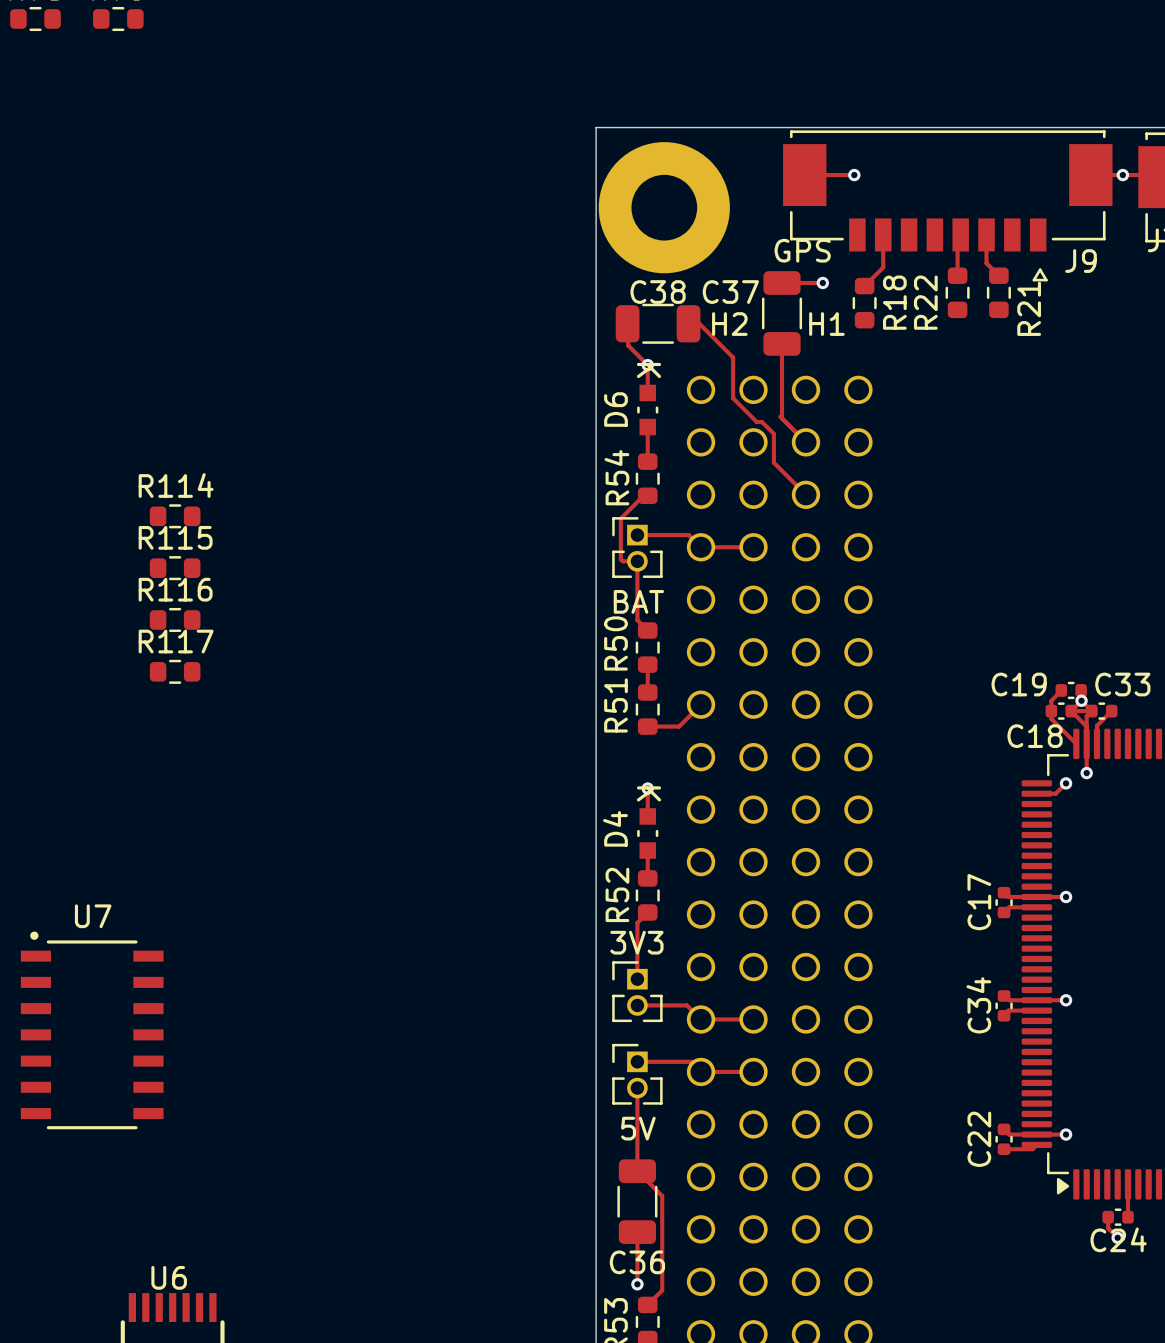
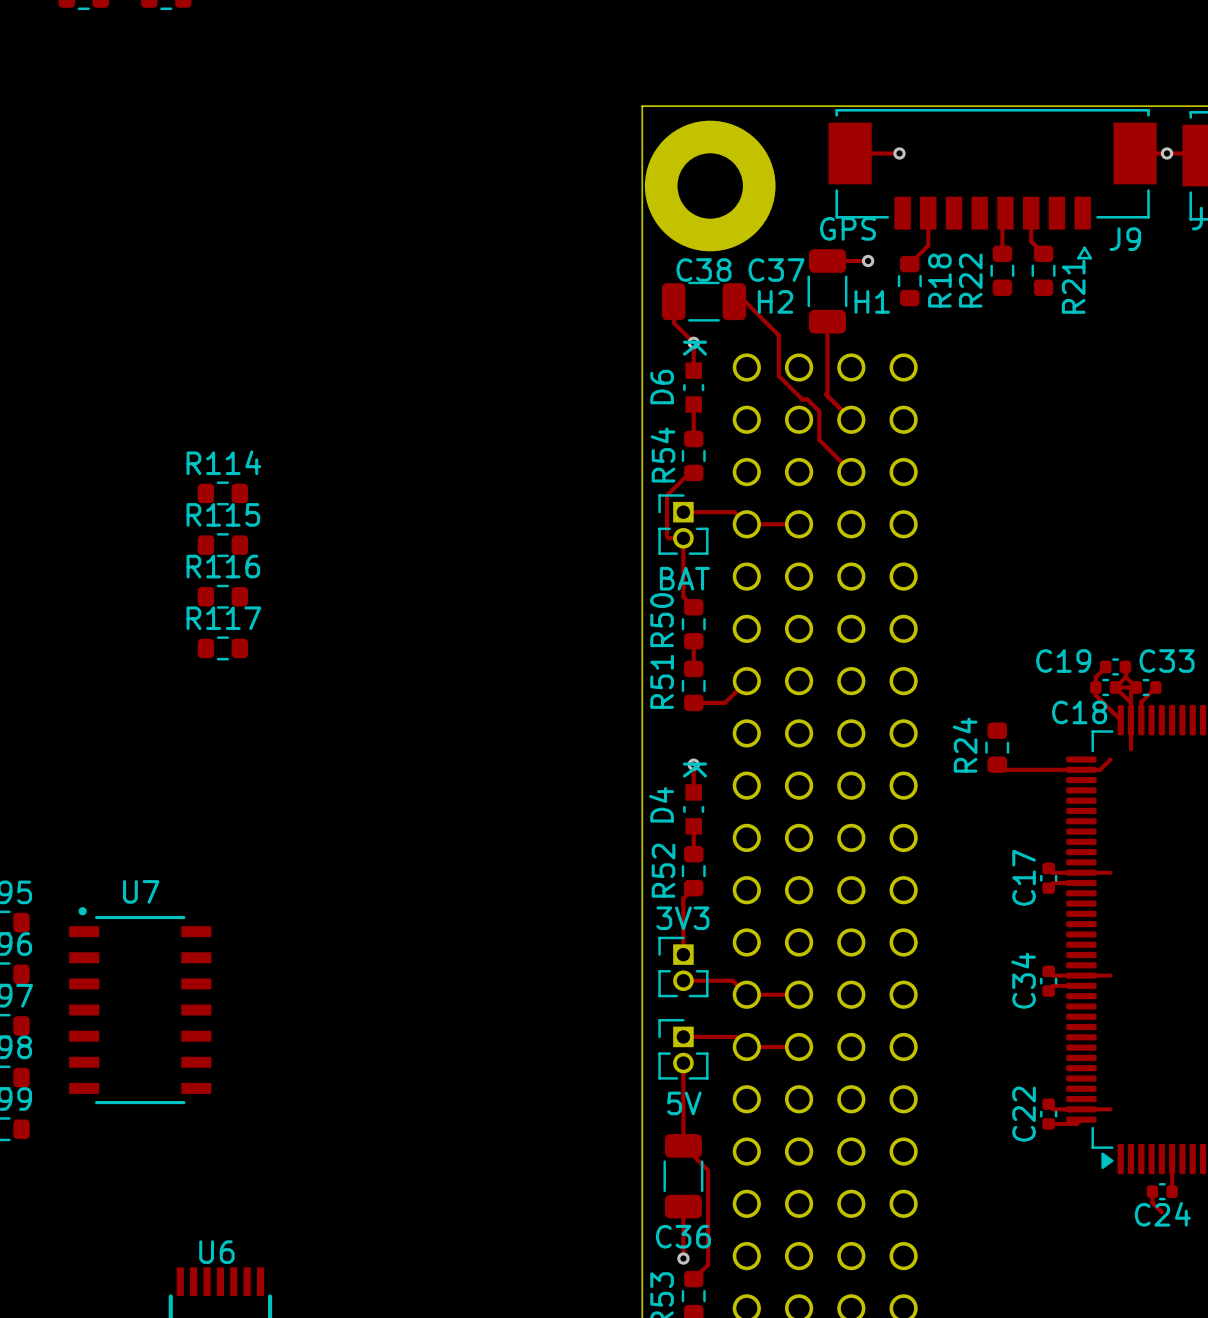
via: (1081, 700) -> none
R24: none -> (997, 747)
via: (1086, 773) -> none
via: (1066, 783) -> none
track: none -> (997, 764) (1002, 769) (1081, 769)
via: (1066, 897) -> none
via: (1066, 1000) -> none
via: (1066, 1134) -> none
via: (1117, 1237) -> none

